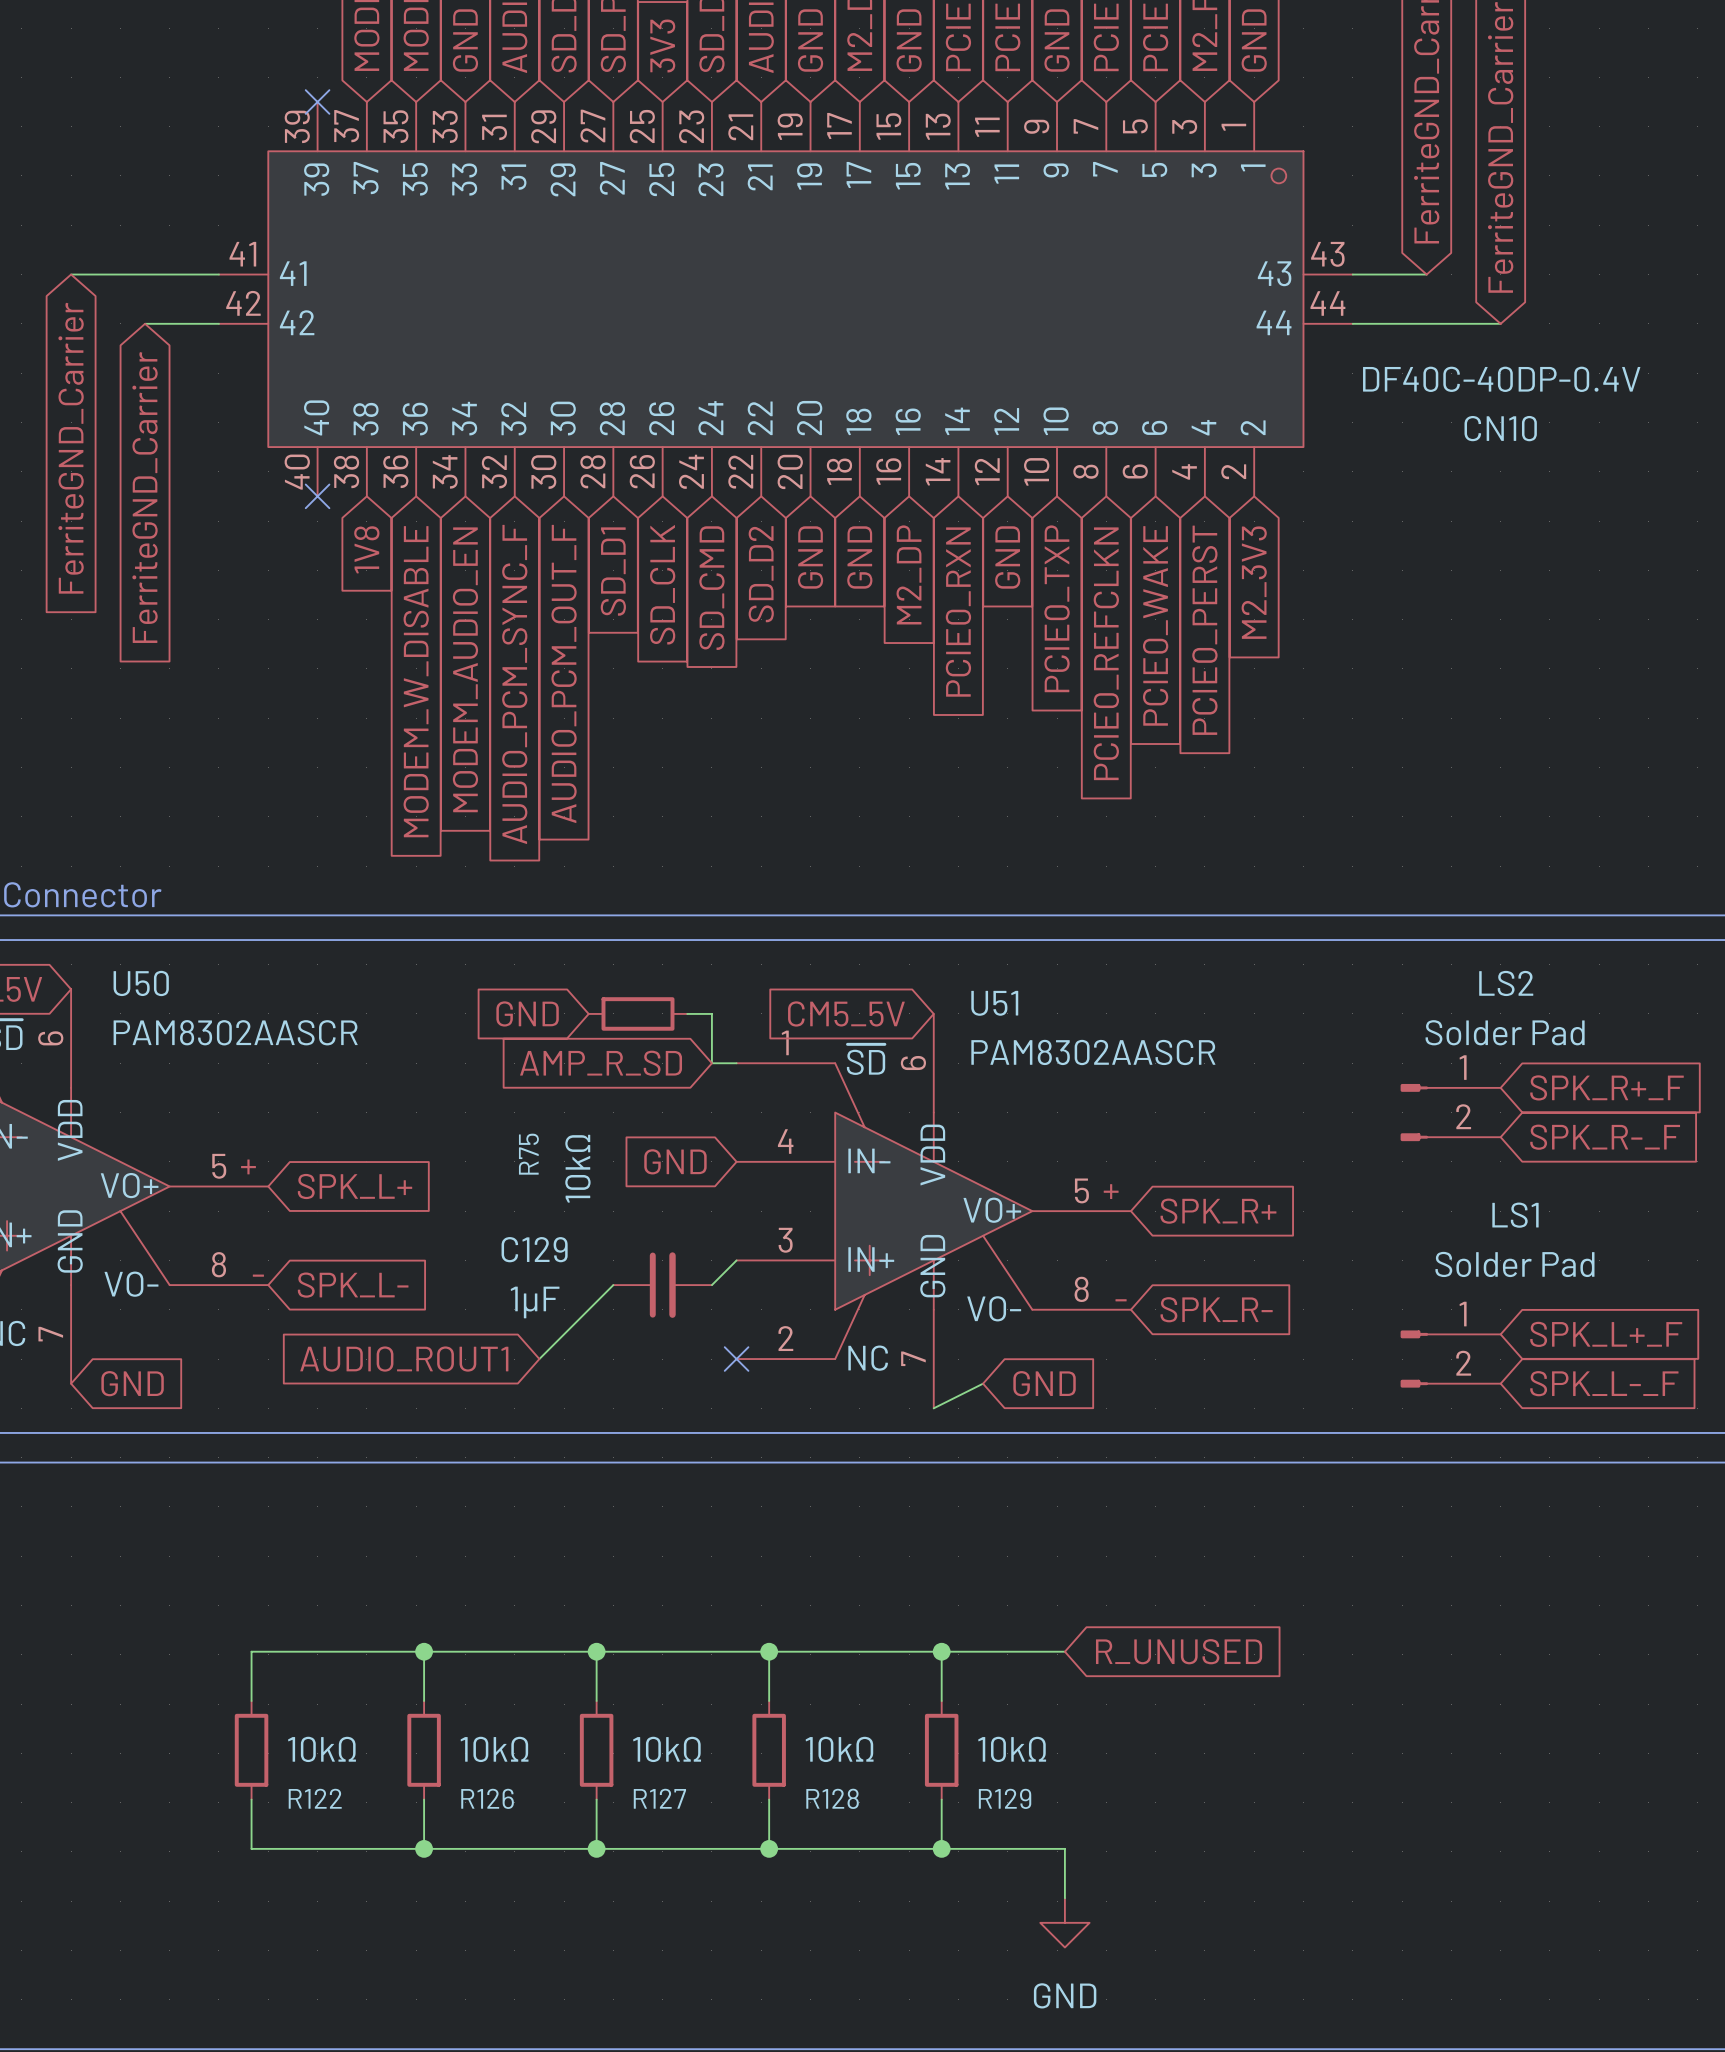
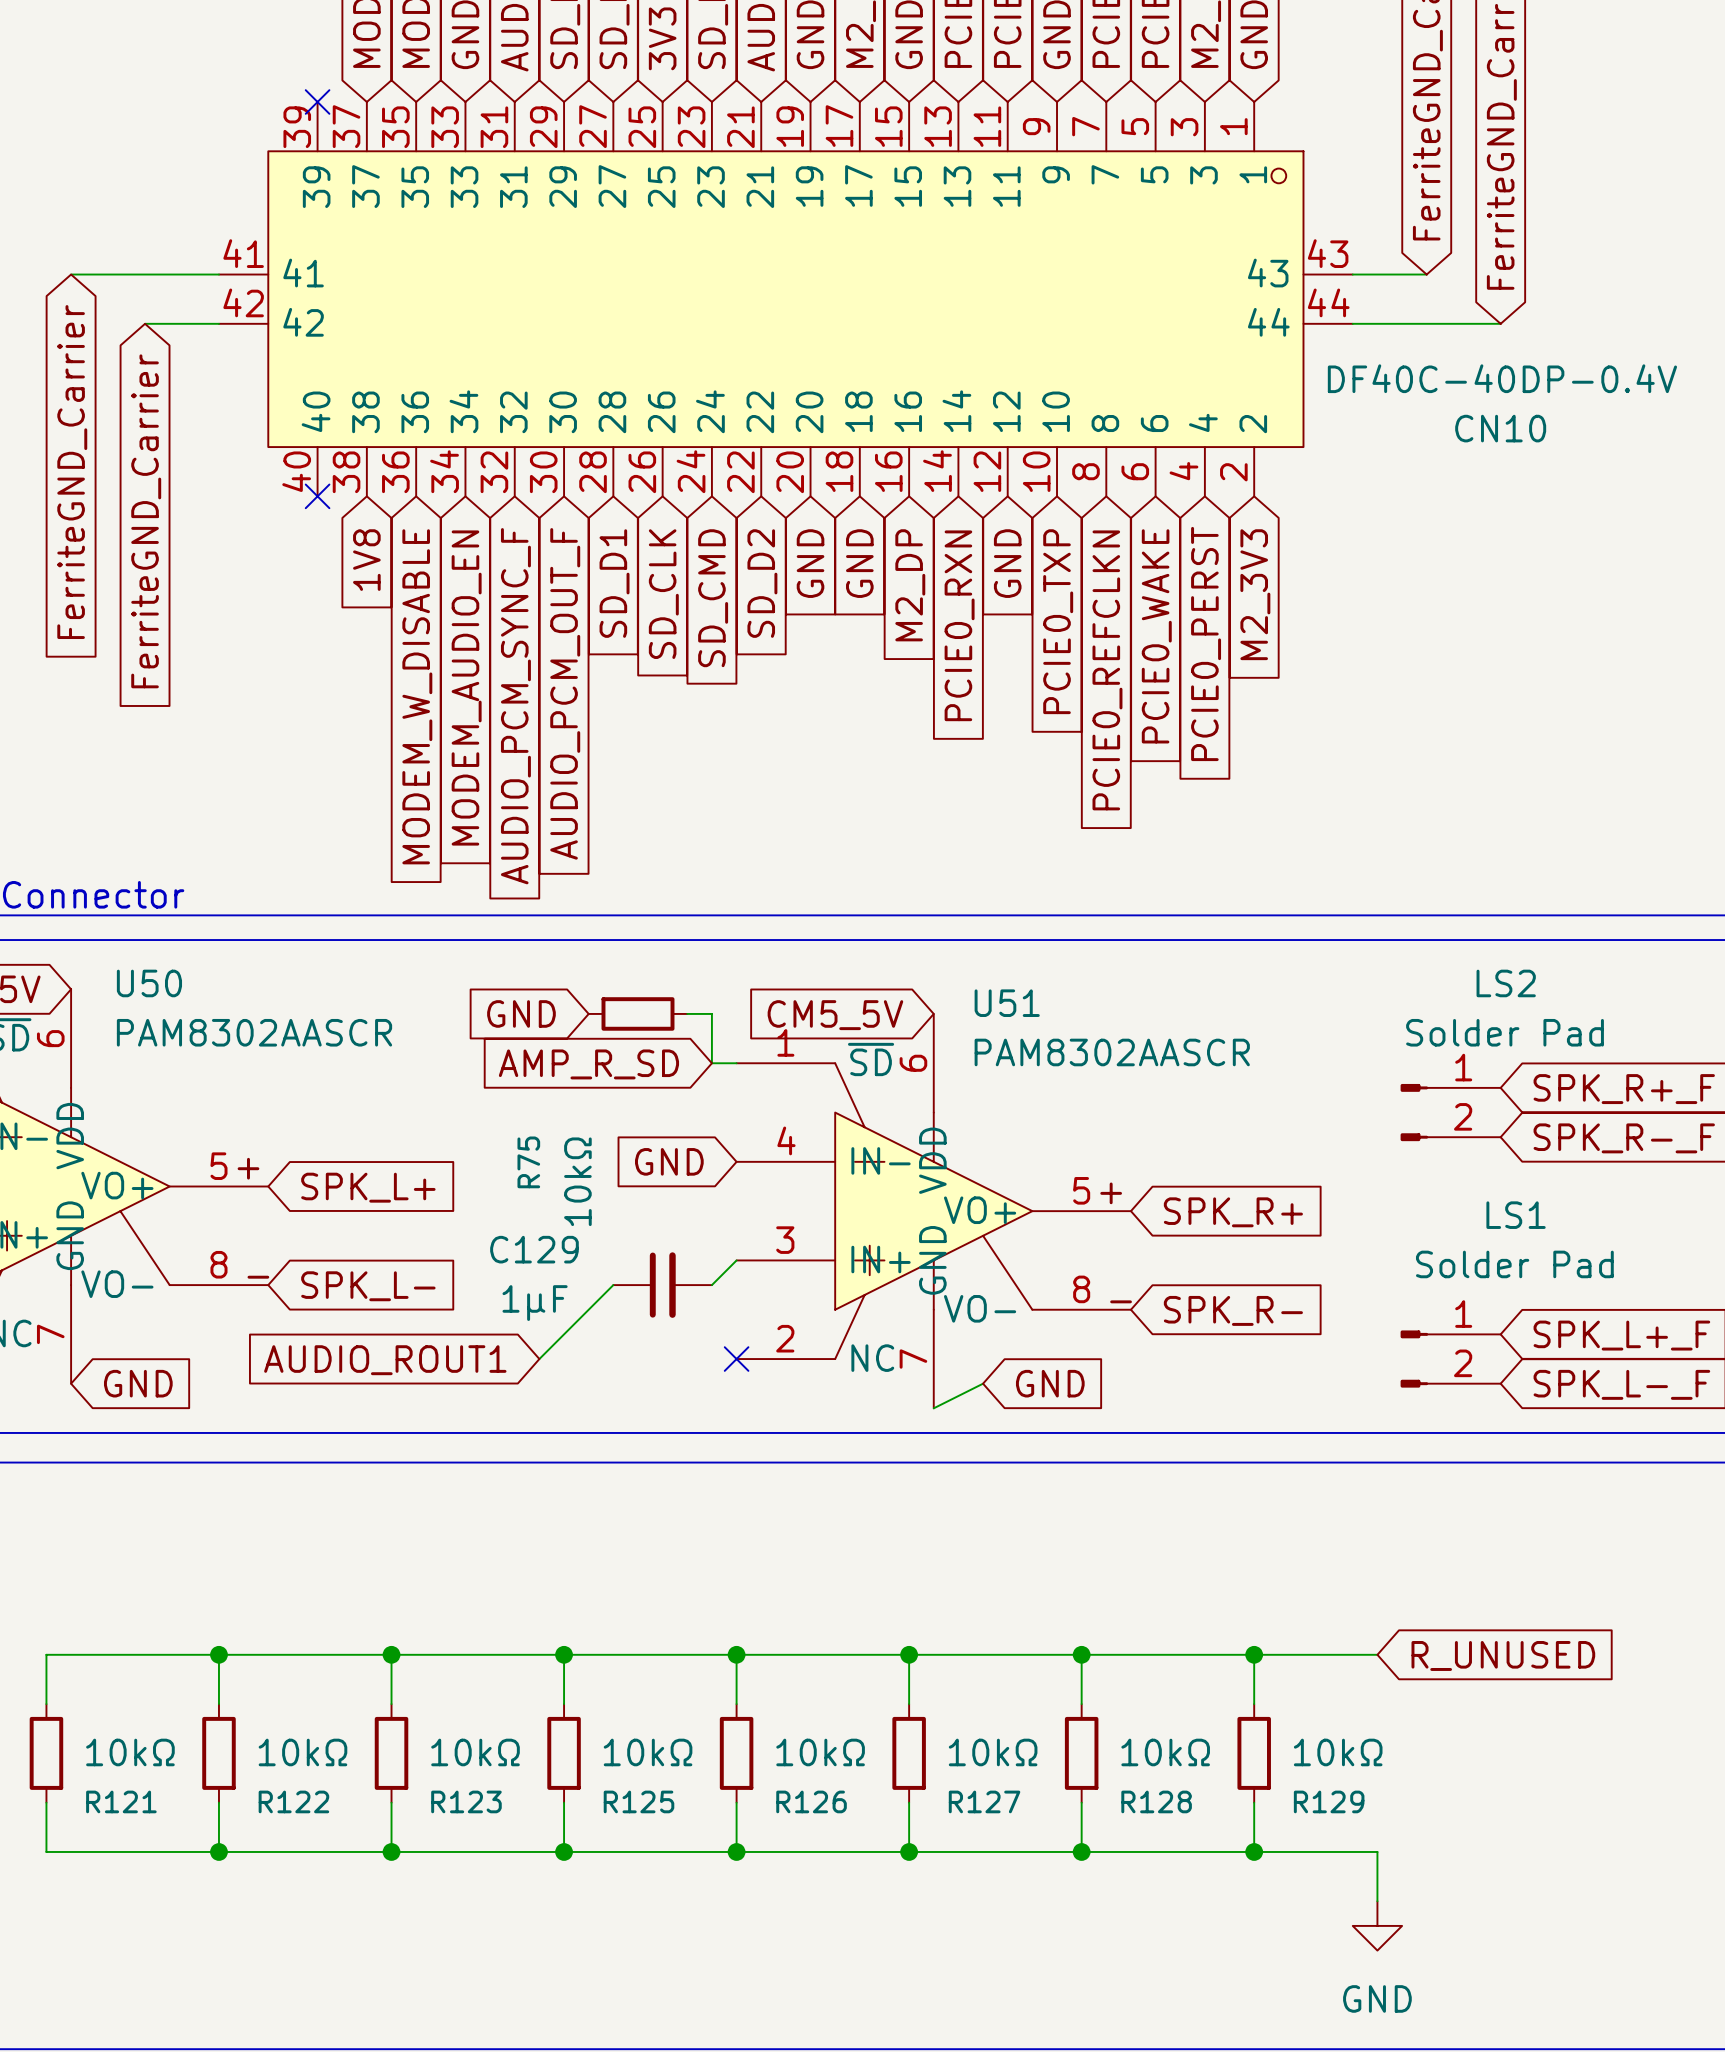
wire: (424, 1651) (424, 1701) -> (391, 1654) (391, 1704)
junction position: (424, 1651) -> (391, 1654)
wire: (596, 1651) (596, 1701) -> (564, 1654) (564, 1704)
junction position: (596, 1651) -> (564, 1654)
wire: (769, 1651) (769, 1701) -> (736, 1654) (736, 1704)
junction position: (769, 1651) -> (736, 1654)
wire: (941, 1651) (941, 1701) -> (909, 1654) (909, 1704)
junction position: (941, 1651) -> (909, 1654)
wire: (1064, 1651) (251, 1651) (251, 1701) -> none
global label position: R_UNUSED (1179, 1651) -> R_UNUSED (1503, 1655)
wire: none -> (218, 1654) (218, 1704)
junction: none -> (218, 1654)
wire: none -> (1081, 1654) (1081, 1704)
junction: none -> (1081, 1654)
wire: none -> (1254, 1654) (1254, 1704)
junction: none -> (1254, 1654)
wire: none -> (1377, 1654) (46, 1654) (46, 1704)
R122 position: (251, 1750) -> (218, 1753)
R126 position: (424, 1750) -> (736, 1753)
R127 position: (596, 1750) -> (909, 1753)
R128 position: (769, 1750) -> (1081, 1753)
R129 position: (941, 1750) -> (1254, 1753)
R121: none -> 10kΩ (46, 1753)
R123: none -> 10kΩ (391, 1753)
R125: none -> 10kΩ (564, 1753)
wire: (251, 1799) (251, 1848) (1064, 1848) (1064, 1898) -> none
wire: (424, 1799) (424, 1848) -> (391, 1802) (391, 1851)
wire: (596, 1799) (596, 1848) -> (564, 1802) (564, 1851)
wire: (769, 1799) (769, 1848) -> (736, 1802) (736, 1851)
wire: (941, 1799) (941, 1848) -> (909, 1802) (909, 1851)
wire: none -> (46, 1802) (46, 1851) (1377, 1851) (1377, 1901)
wire: none -> (218, 1802) (218, 1851)
wire: none -> (1081, 1802) (1081, 1851)
wire: none -> (1254, 1802) (1254, 1851)
junction position: (424, 1848) -> (391, 1851)
junction position: (596, 1848) -> (564, 1851)
junction position: (769, 1848) -> (736, 1851)
junction position: (941, 1848) -> (909, 1851)
junction: none -> (218, 1851)
junction: none -> (1081, 1851)
junction: none -> (1254, 1851)
power symbol position: GND (1064, 1922) -> GND (1377, 1925)

